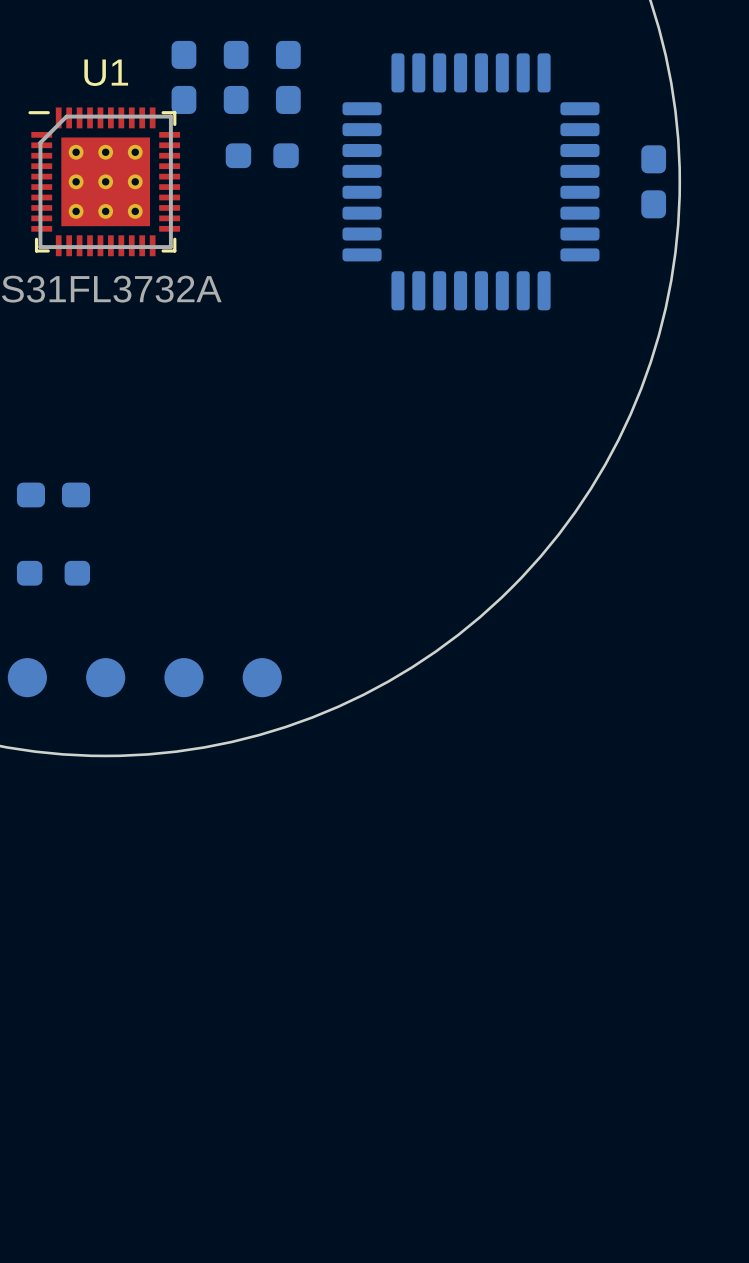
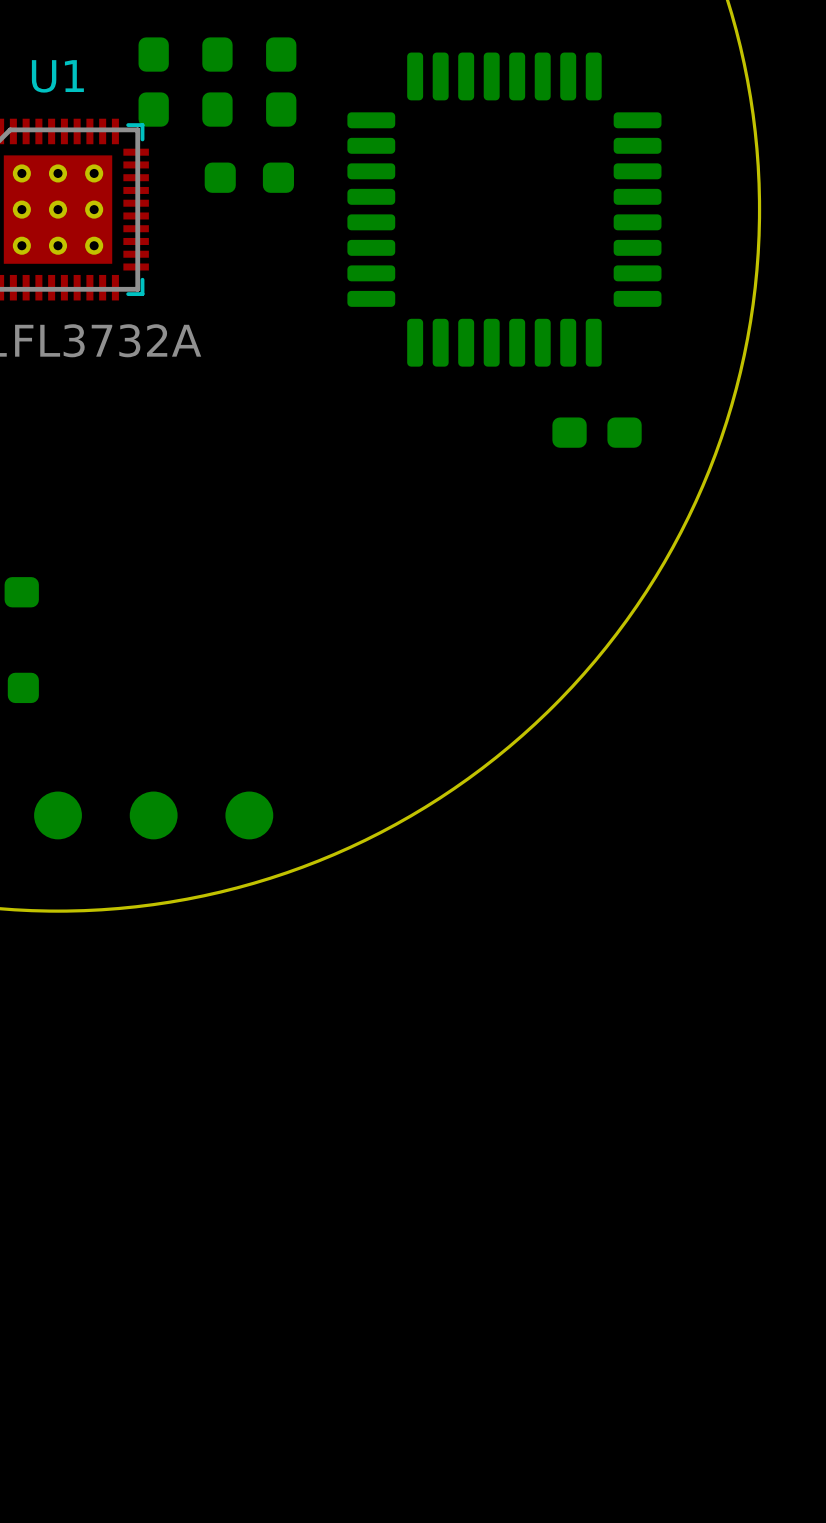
part rotation: 0° (653, 181) -> 90° clockwise (597, 432)
part position: (653, 181) -> (597, 432)

